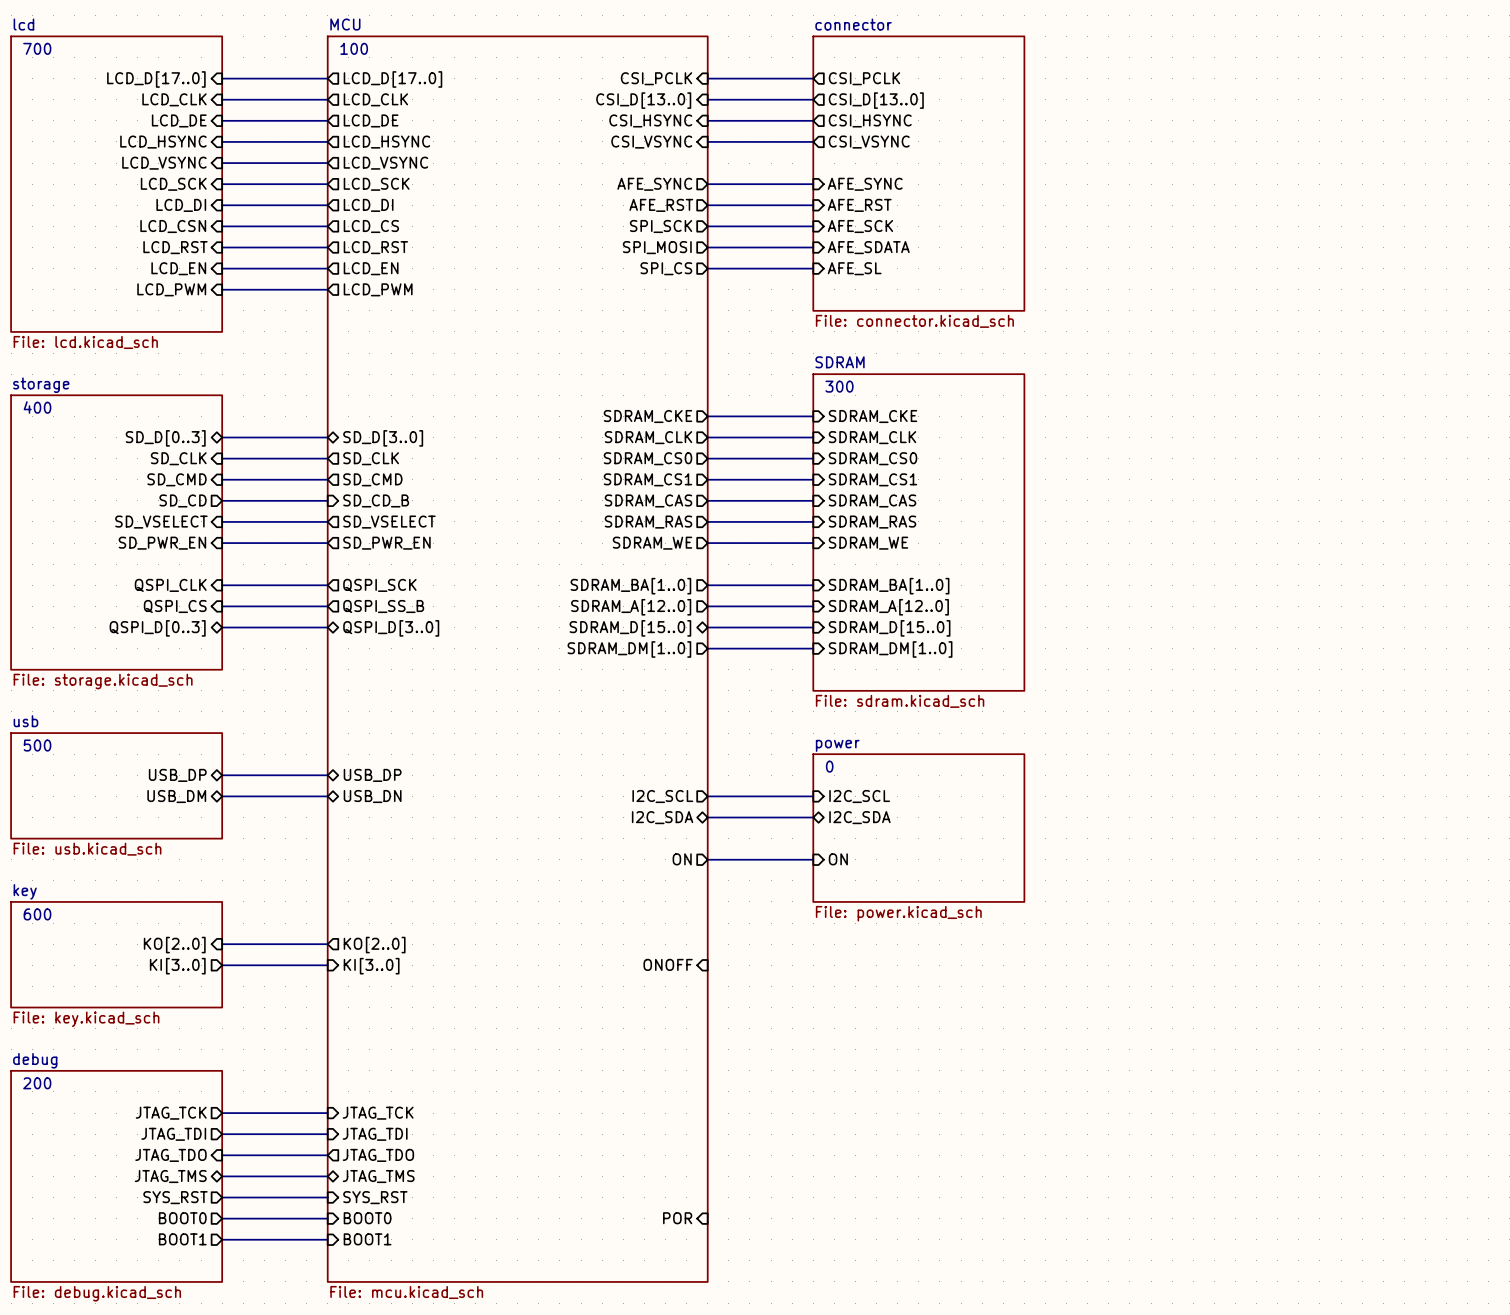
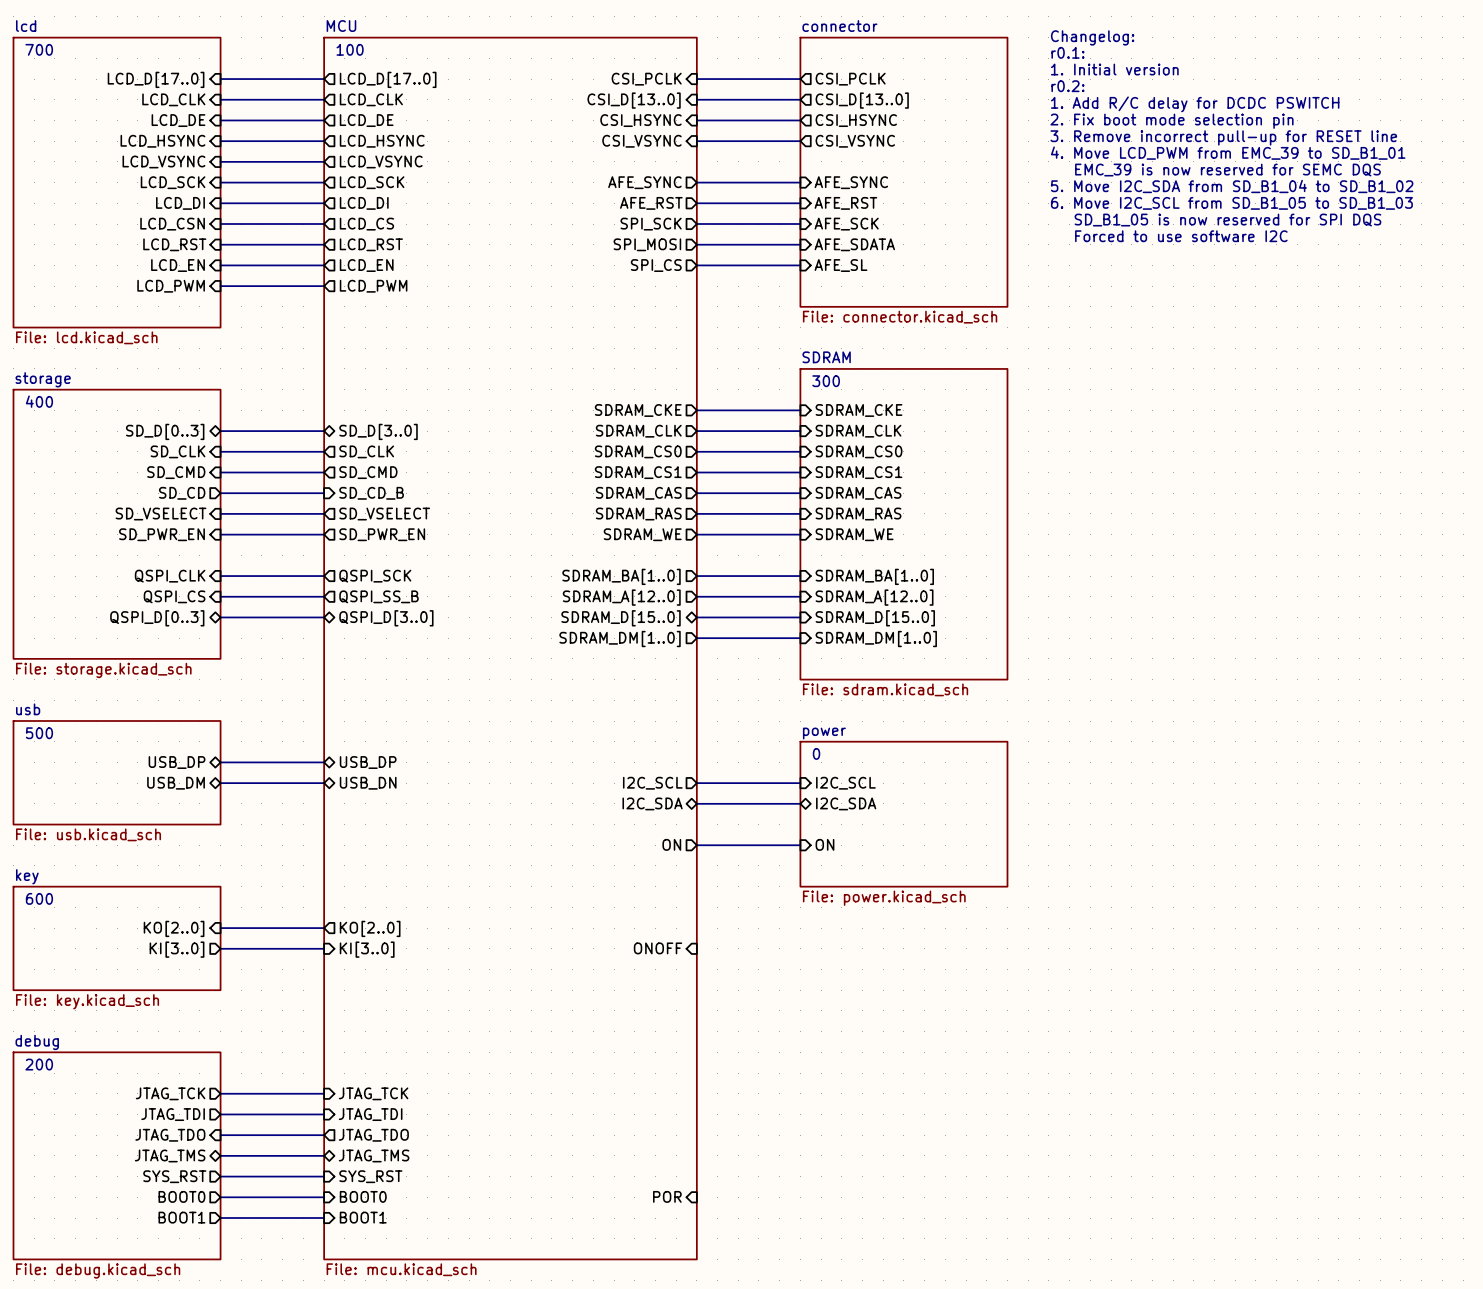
text: none -> Changelog: (1092, 37)
text: none -> r0.1: (1067, 52)
text: none -> 1. Initial version (1114, 69)
text: none -> r0.2: (1067, 86)
text: none -> 1. Add R/C delay for DCDC PSWITCH (1195, 104)
text: none -> 2. Fix boot mode selection pin (1172, 121)
text: none -> 3. Remove incorrect pull-up for RESET line (1223, 137)
text: none -> 4. Move LCD_PWM from EMC_39 to SD_B1_01 (1228, 153)
text: none -> EMC_39 is now reserved for SEMC DQS (1227, 170)
text: none -> 5. Move I2C_SDA from SD_B1_04 to SD_B1_02 (1232, 186)
text: none -> 6. Move I2C_SCL from SD_B1_05 to SD_B1_03 (1231, 203)
text: none -> SD_B1_05 is now reserved for SPI DQS (1227, 220)
text: none -> Forced to use software I2C (1181, 236)

